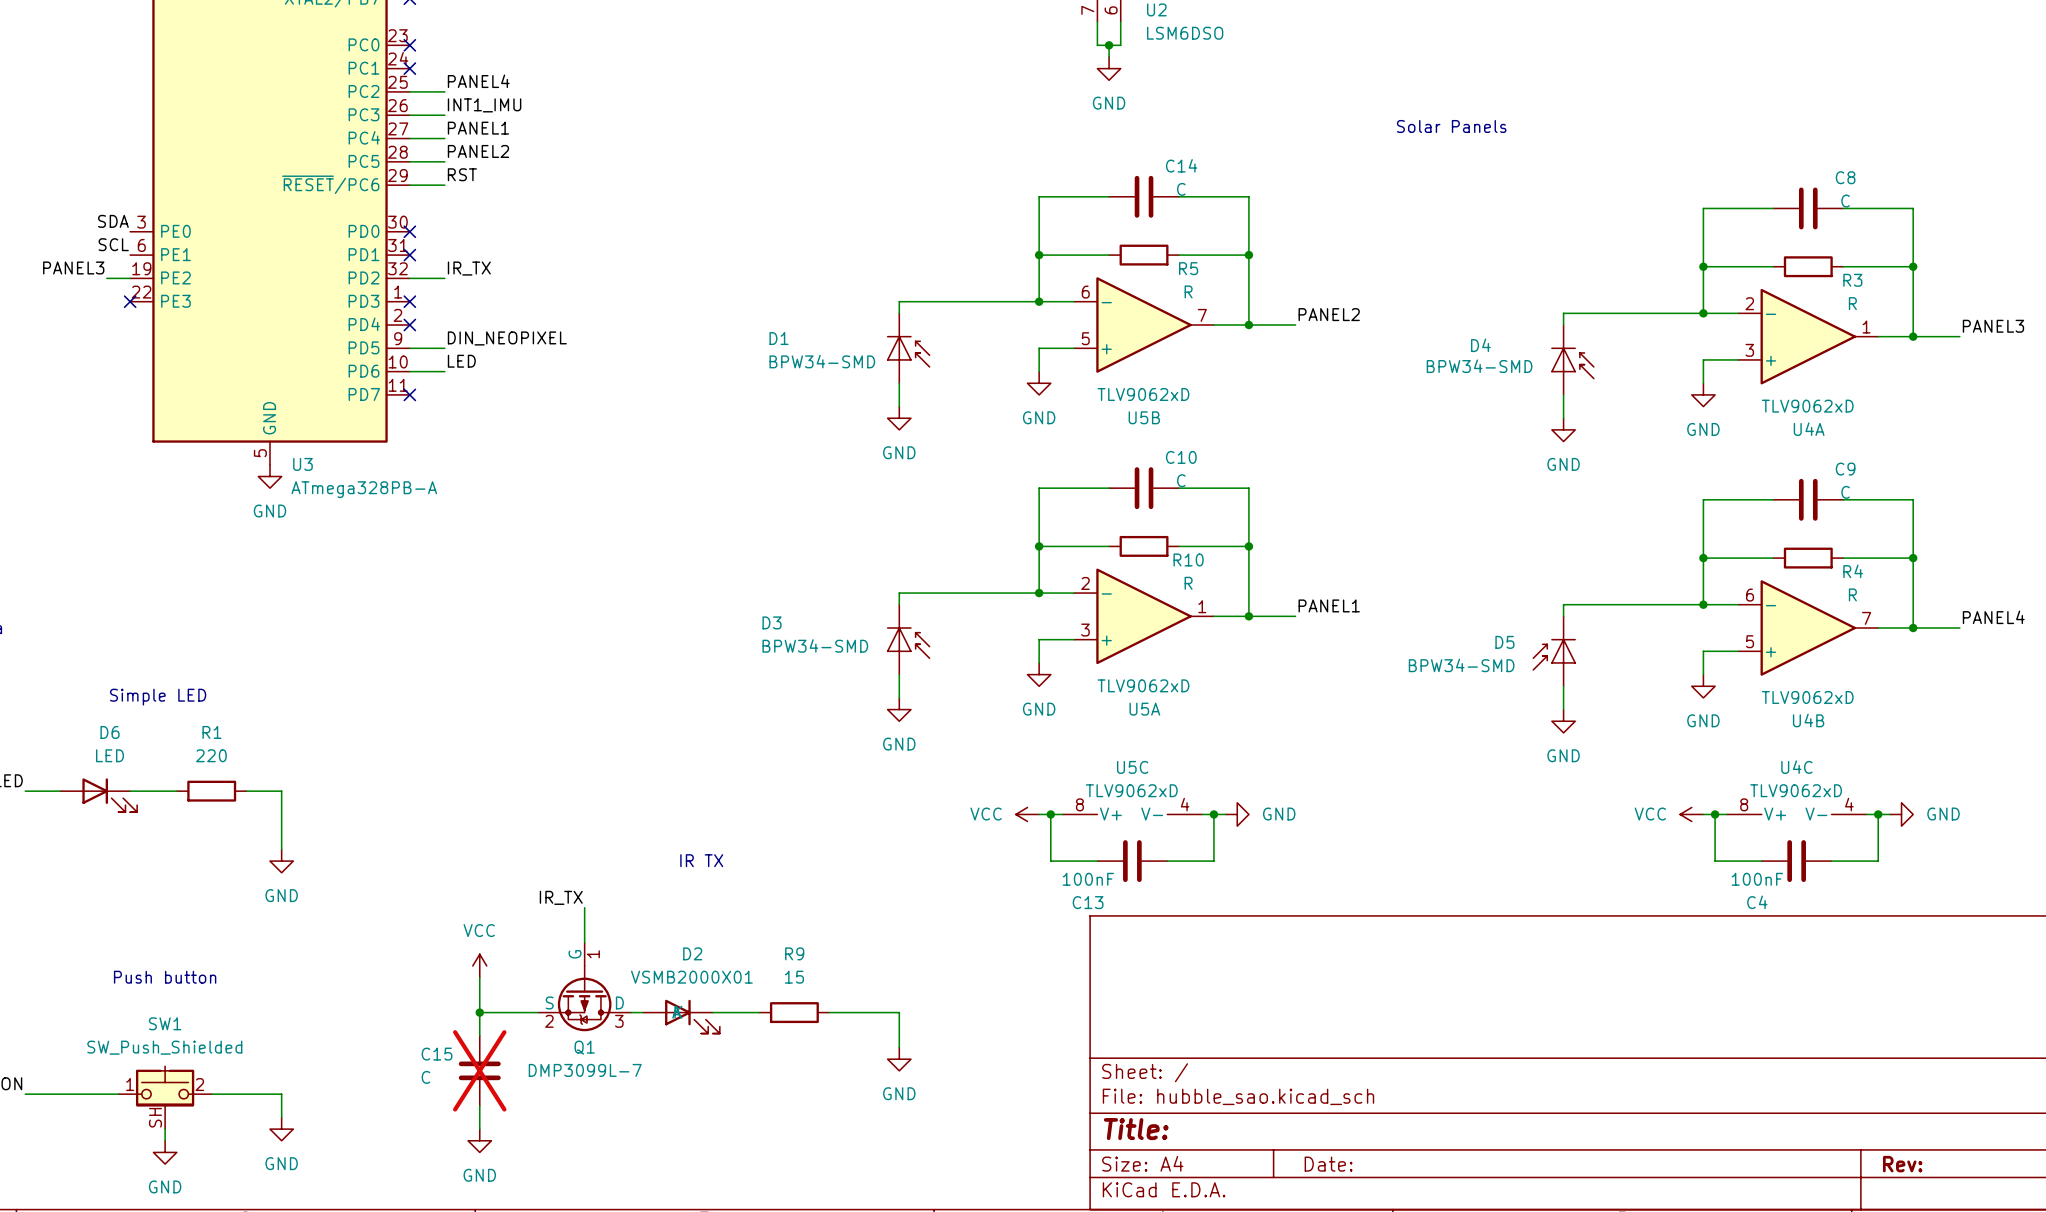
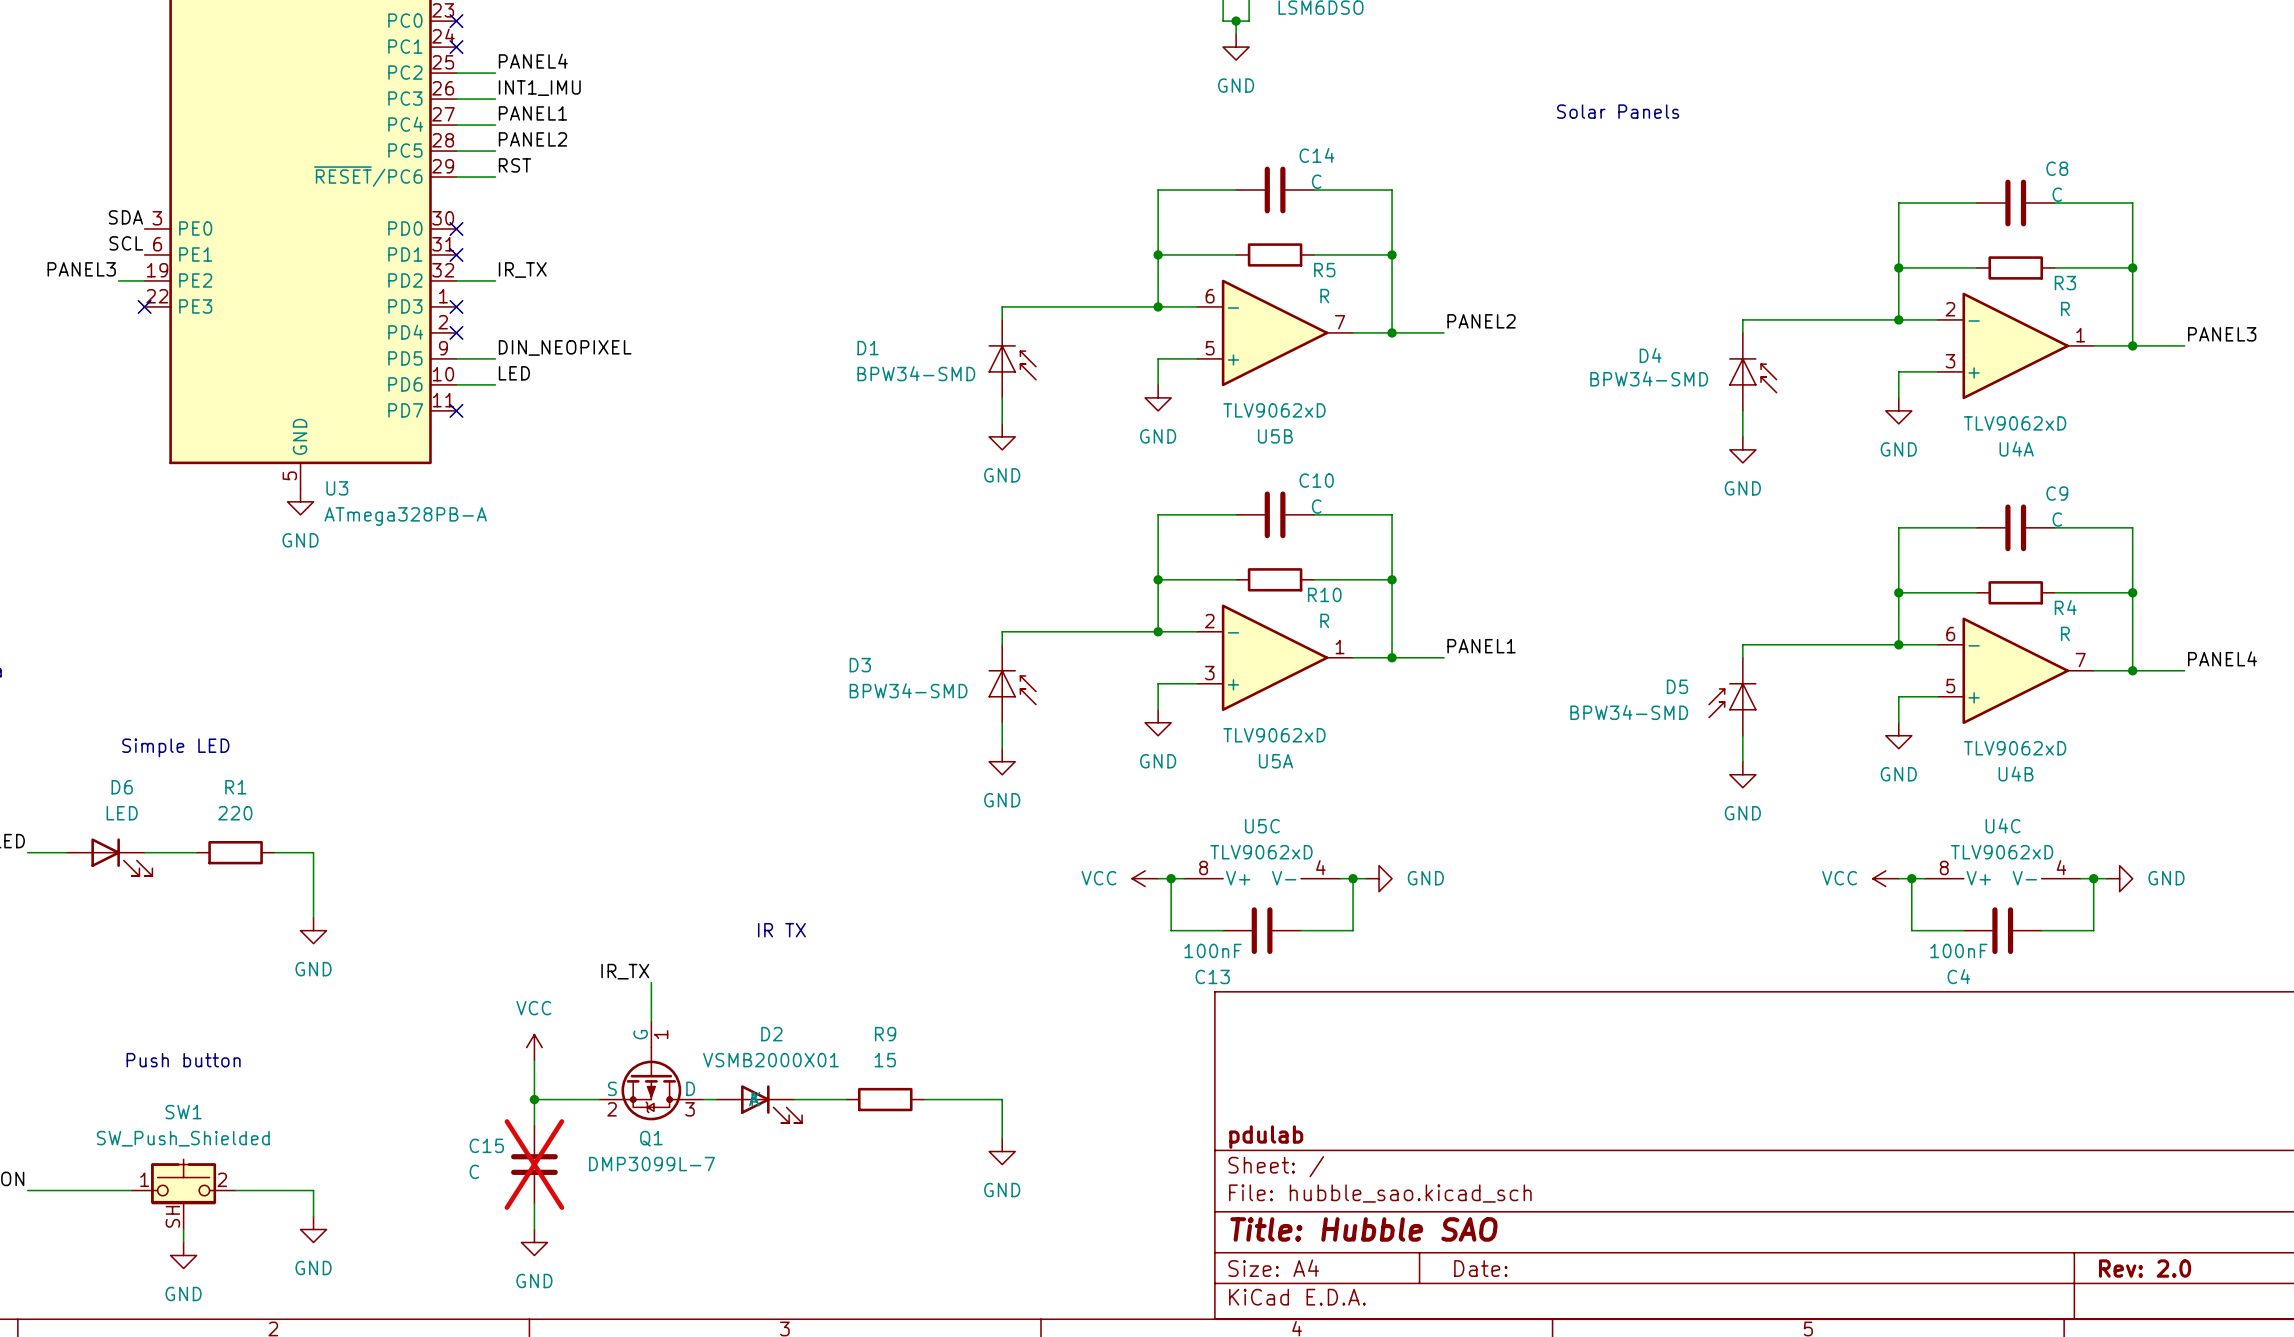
title block: none -> pdulab (1266, 1137)
title block: Title: (1136, 1129) -> Title: Hubble SAO (1363, 1229)
title block: Rev: (1902, 1164) -> Rev: 2.0 (2145, 1268)

